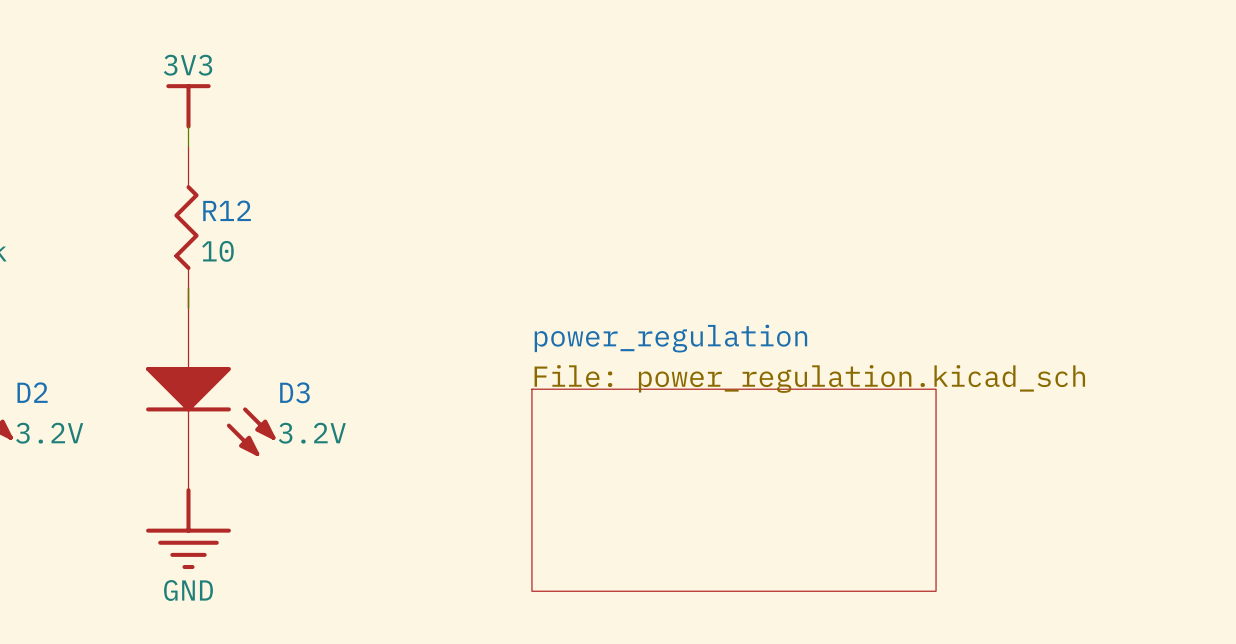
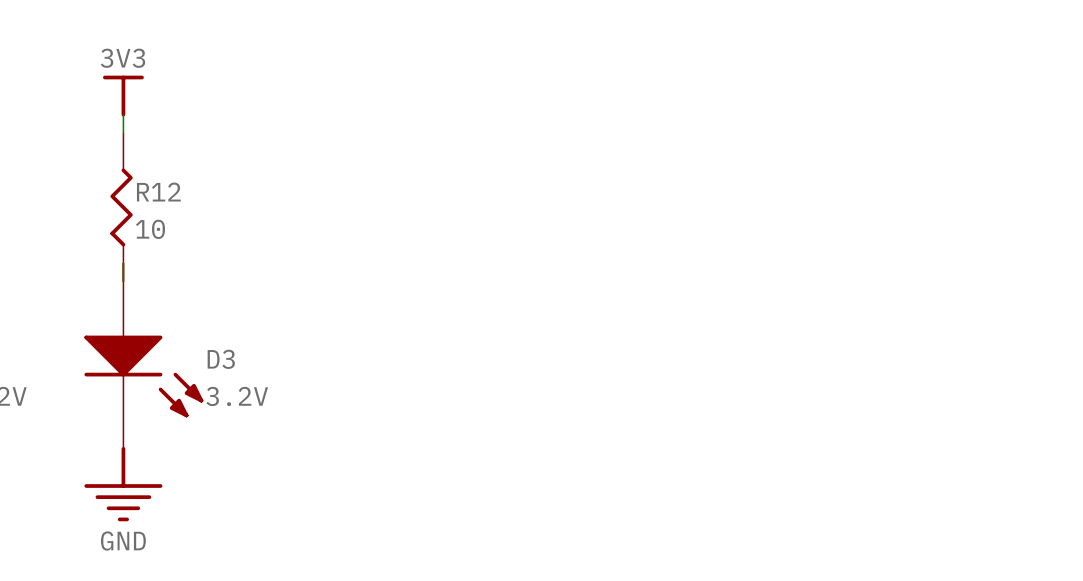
sheet power_regulation: File: power_regulation.kicad_sch (734, 490) -> none

